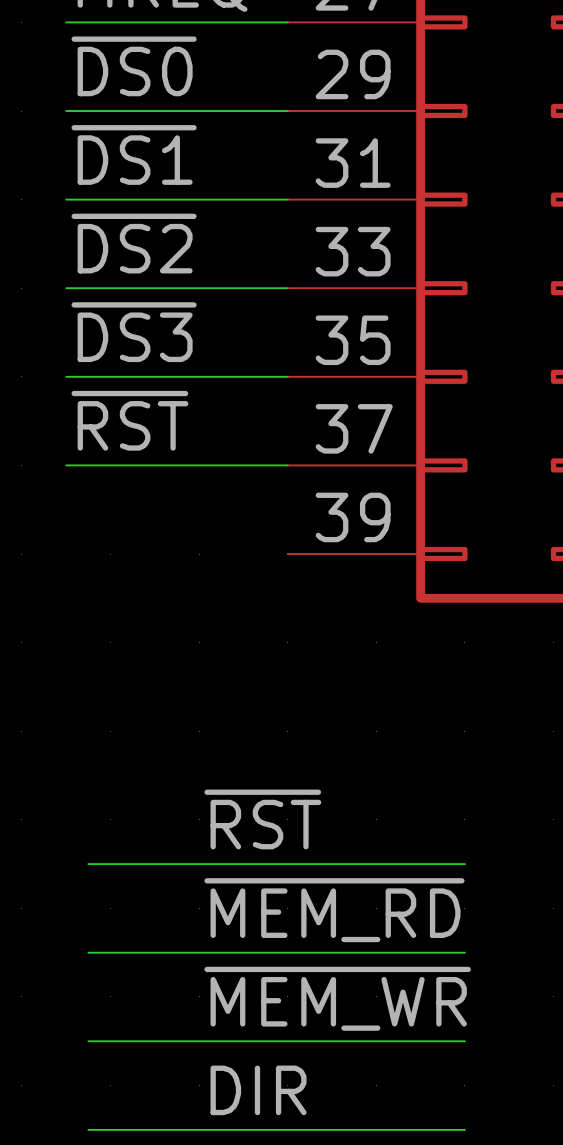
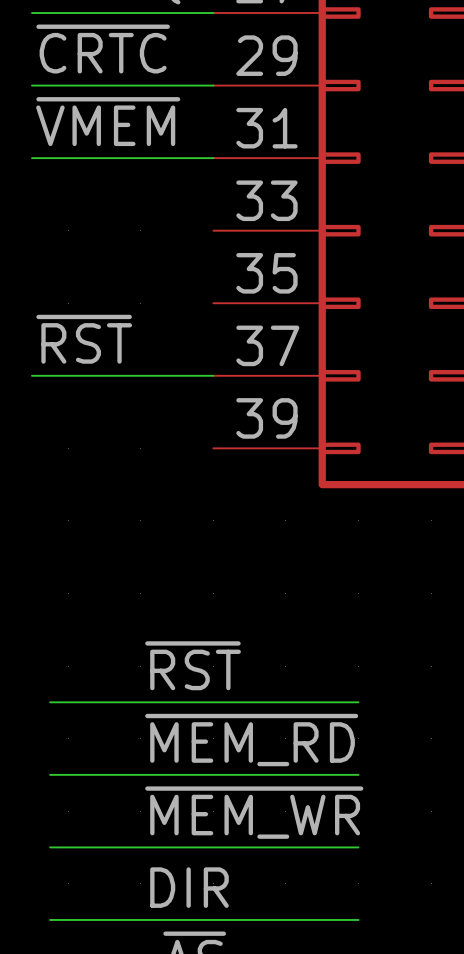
label: ~{DS0} (134, 66) -> ~{CRTC} (103, 49)
label: ~{DS1} (134, 154) -> ~{VMEM} (108, 121)
label: ~{DS2} (134, 243) -> none
wire: (66, 288) (287, 288) -> none
label: ~{DS3} (134, 332) -> none
wire: (66, 376) (287, 376) -> none

